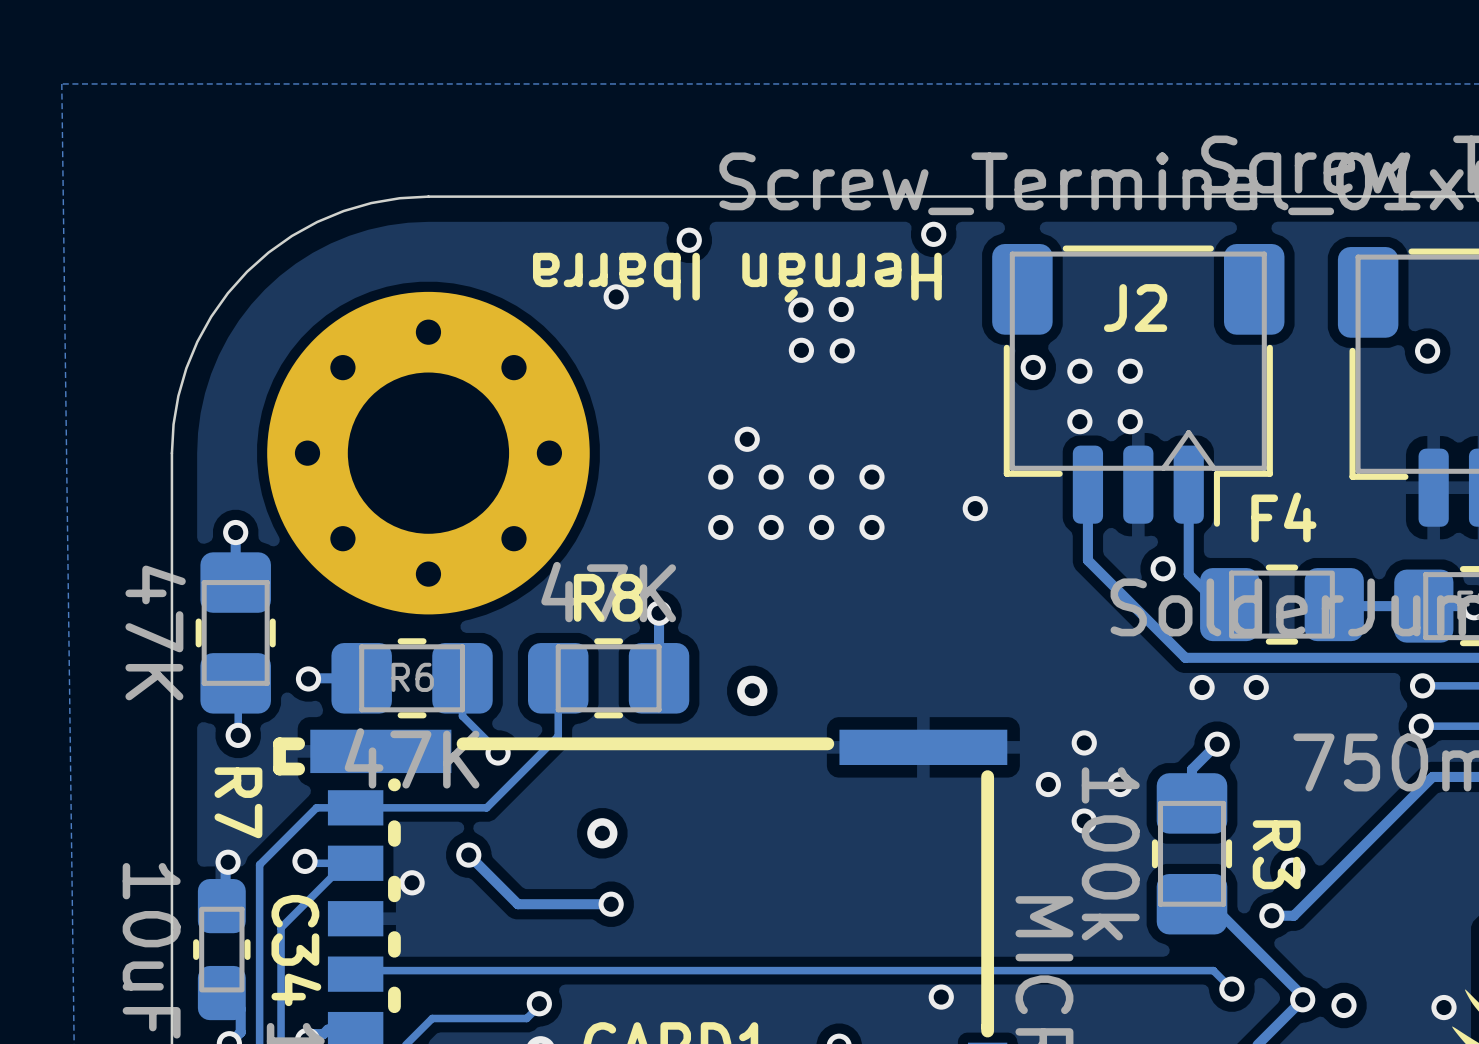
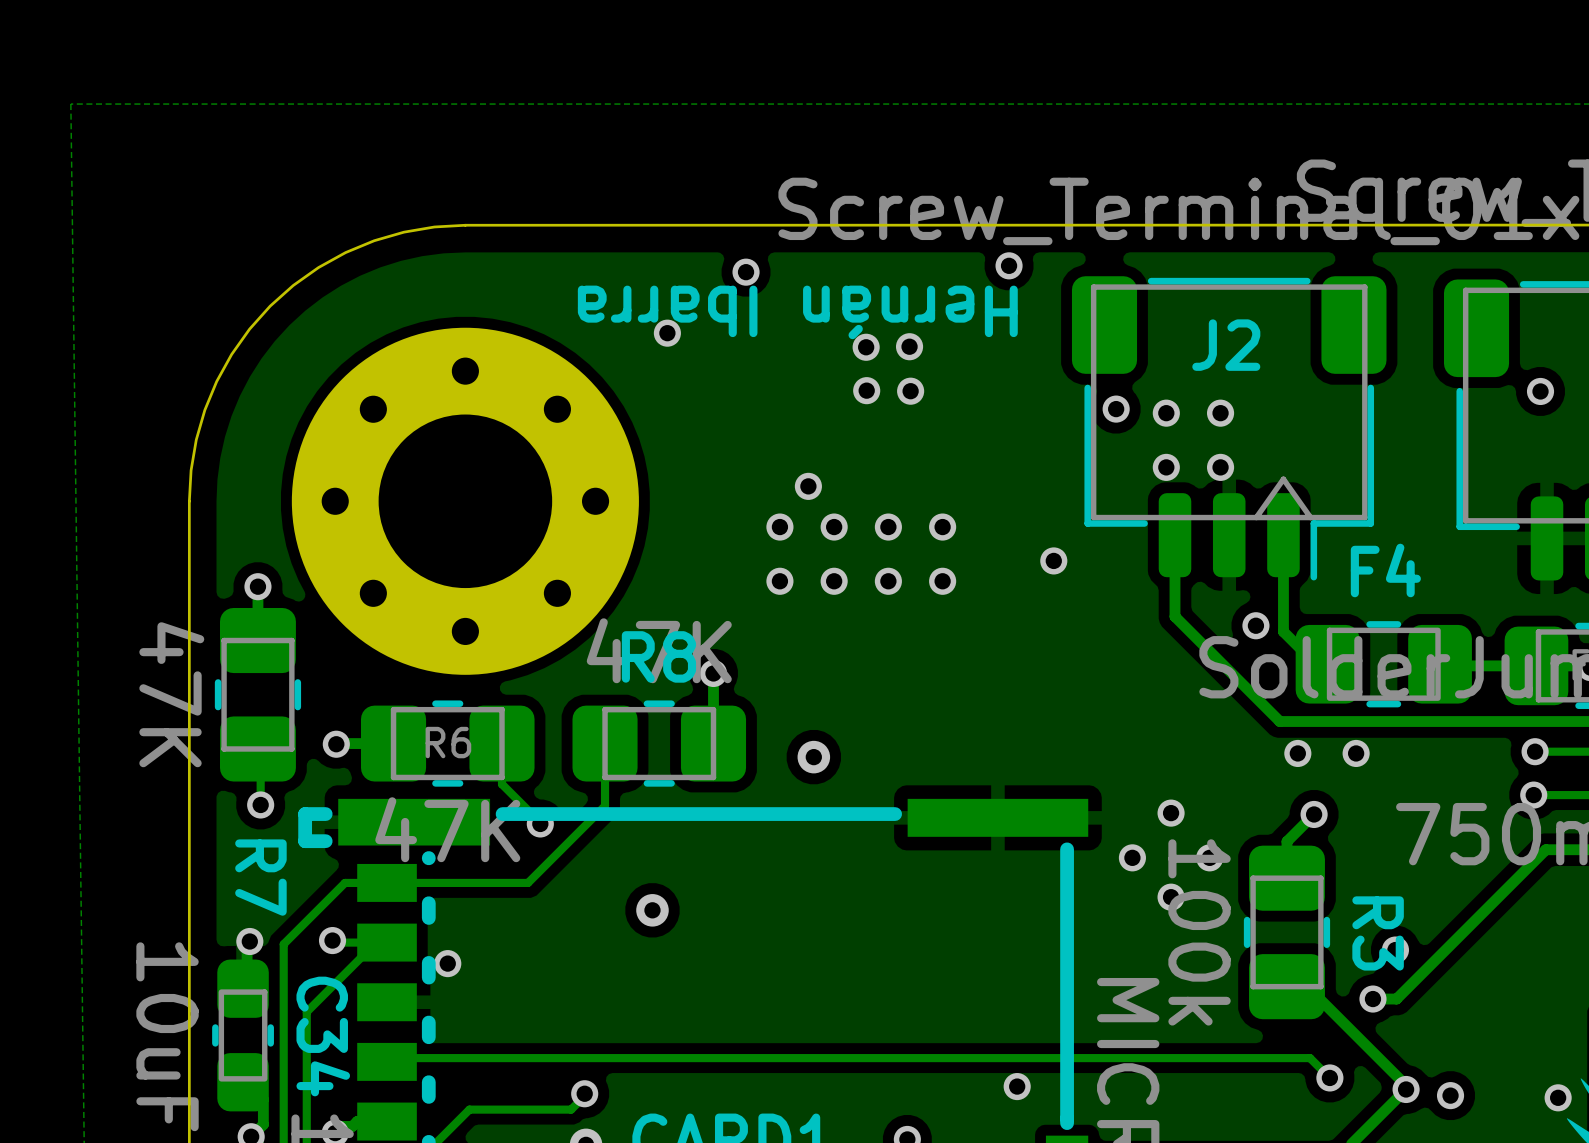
track: (468, 855) (517, 904) (611, 904) -> none
via: (468, 855) -> none
via: (611, 904) -> none

